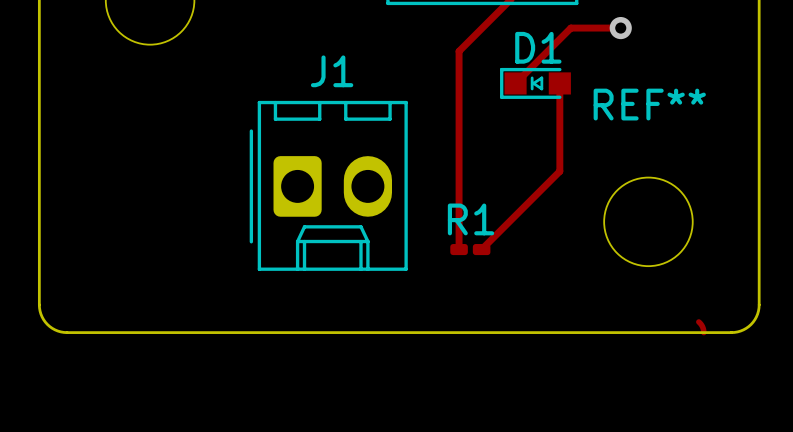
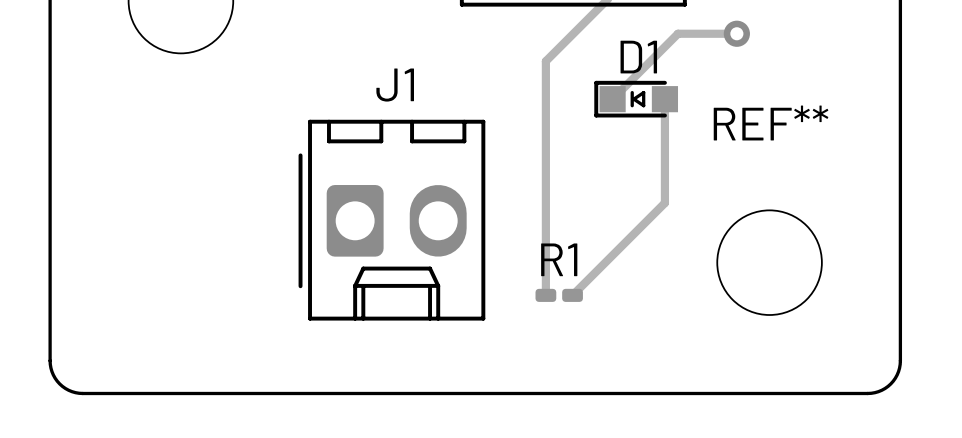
track: (698, 321) (703, 332) -> none

